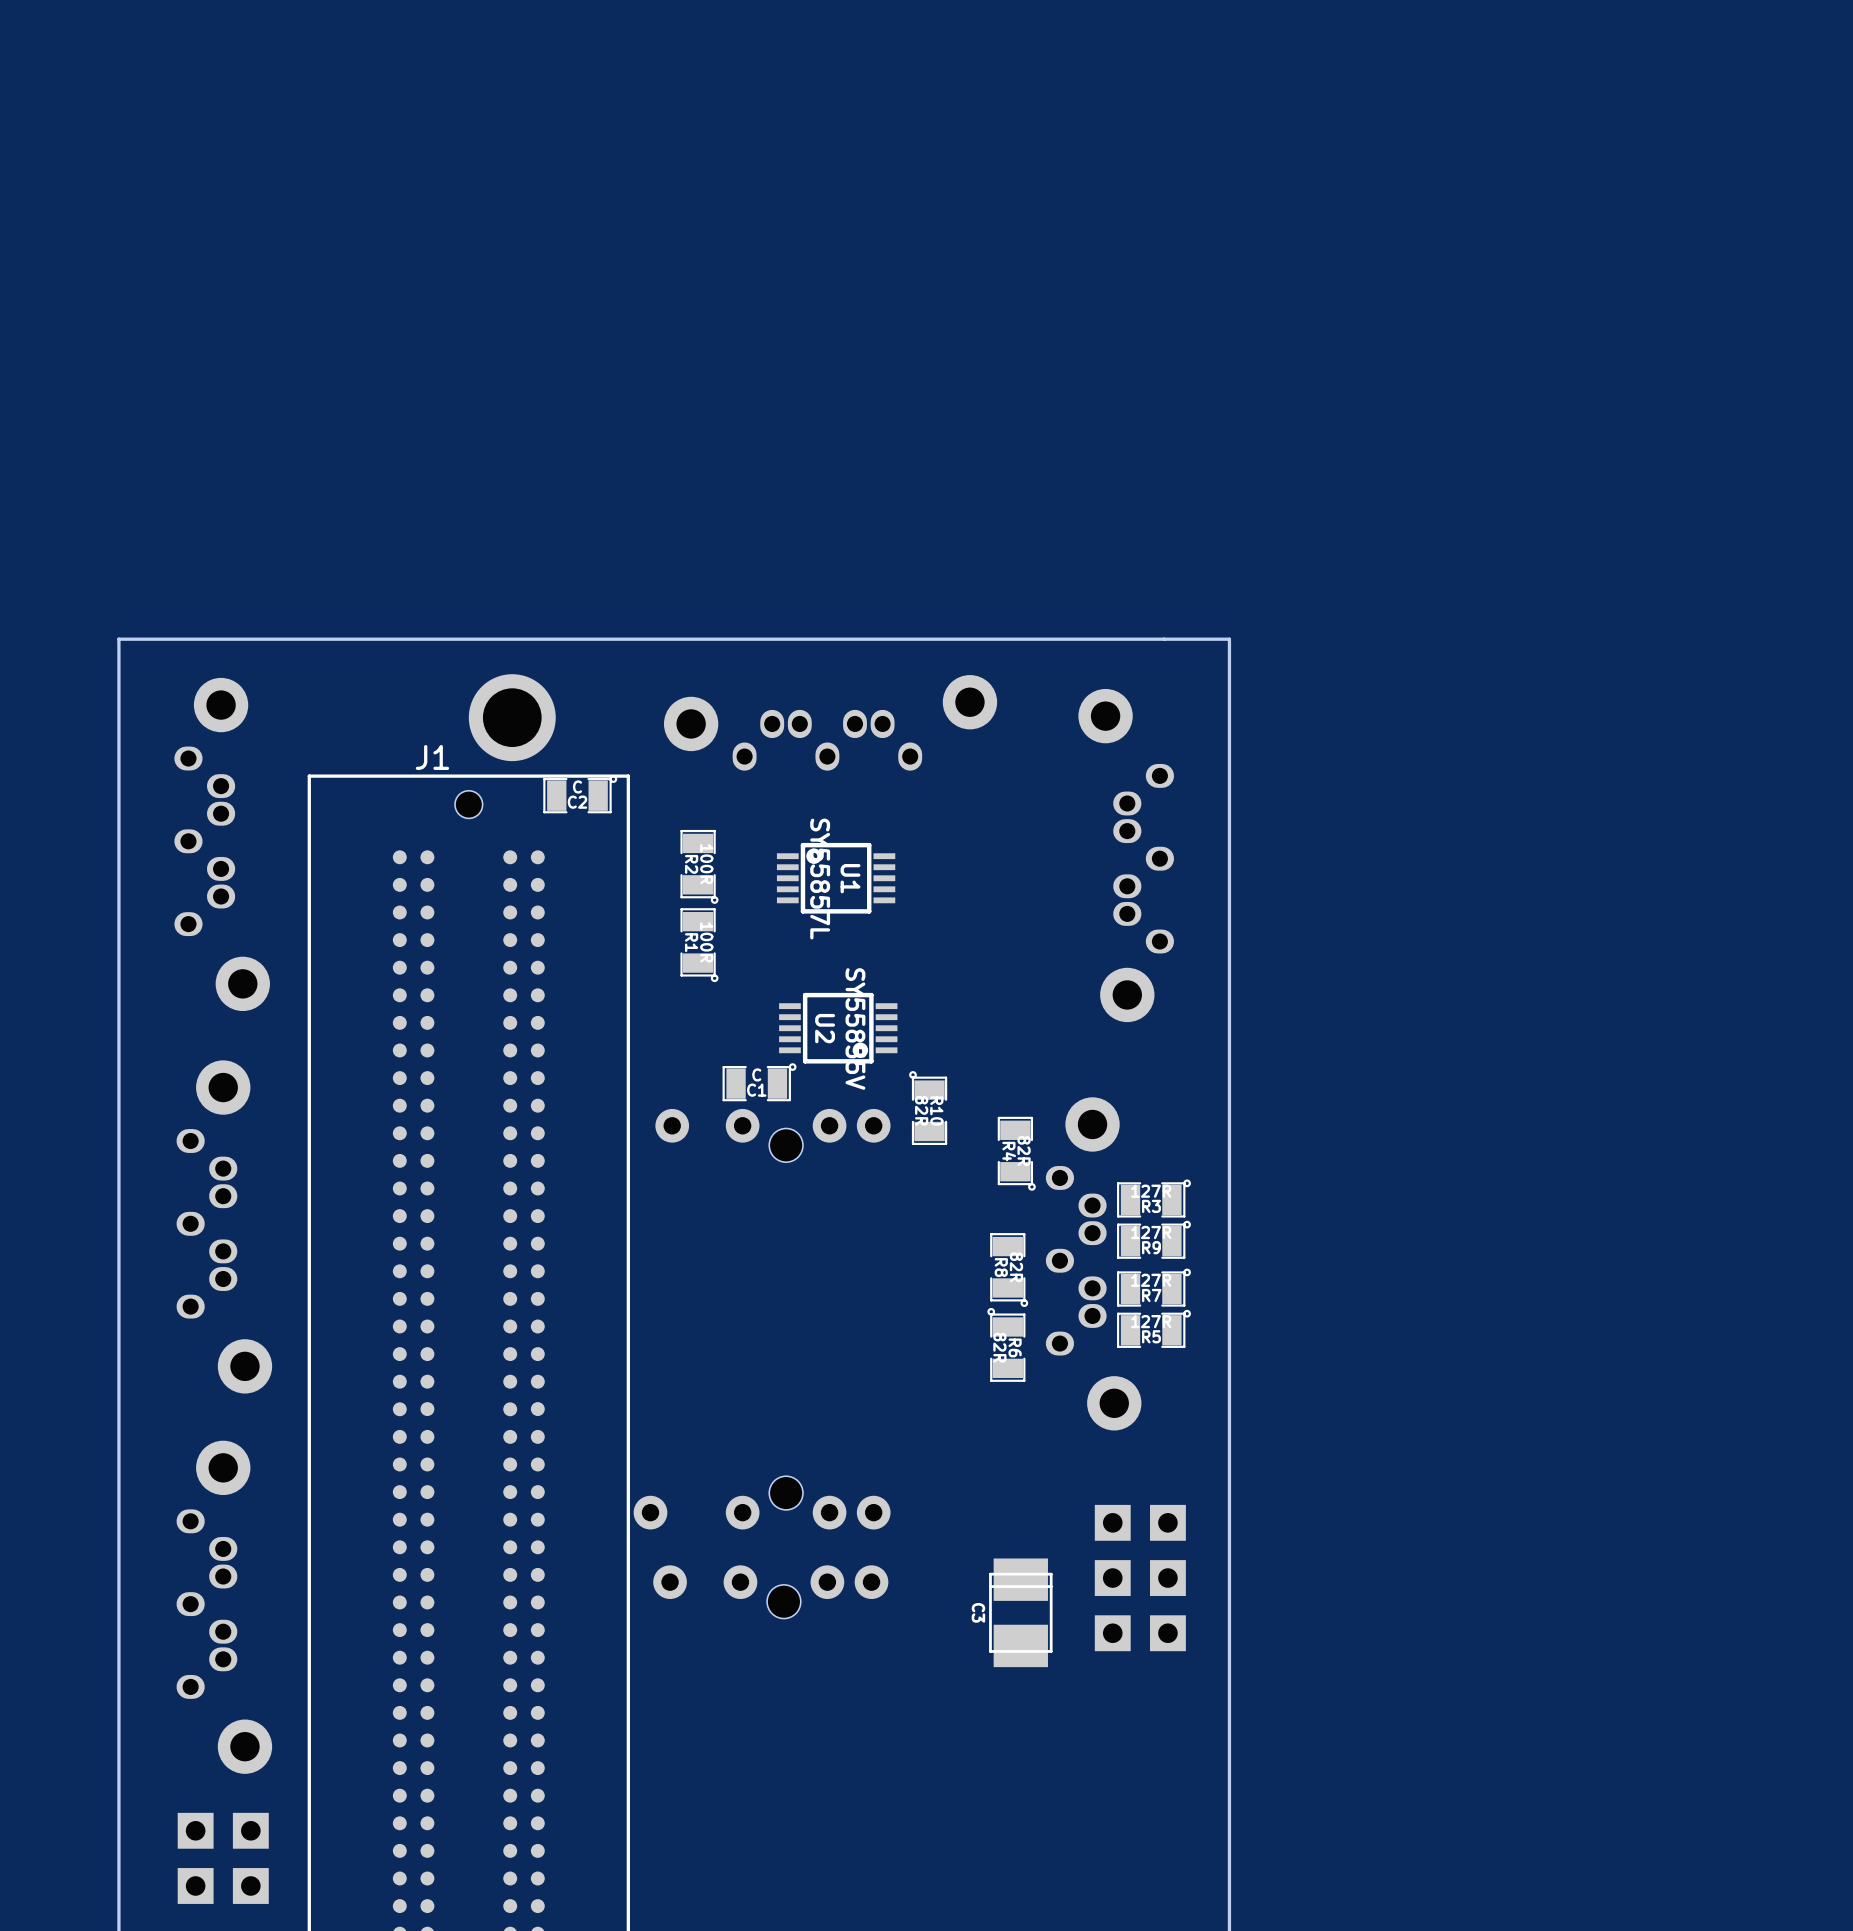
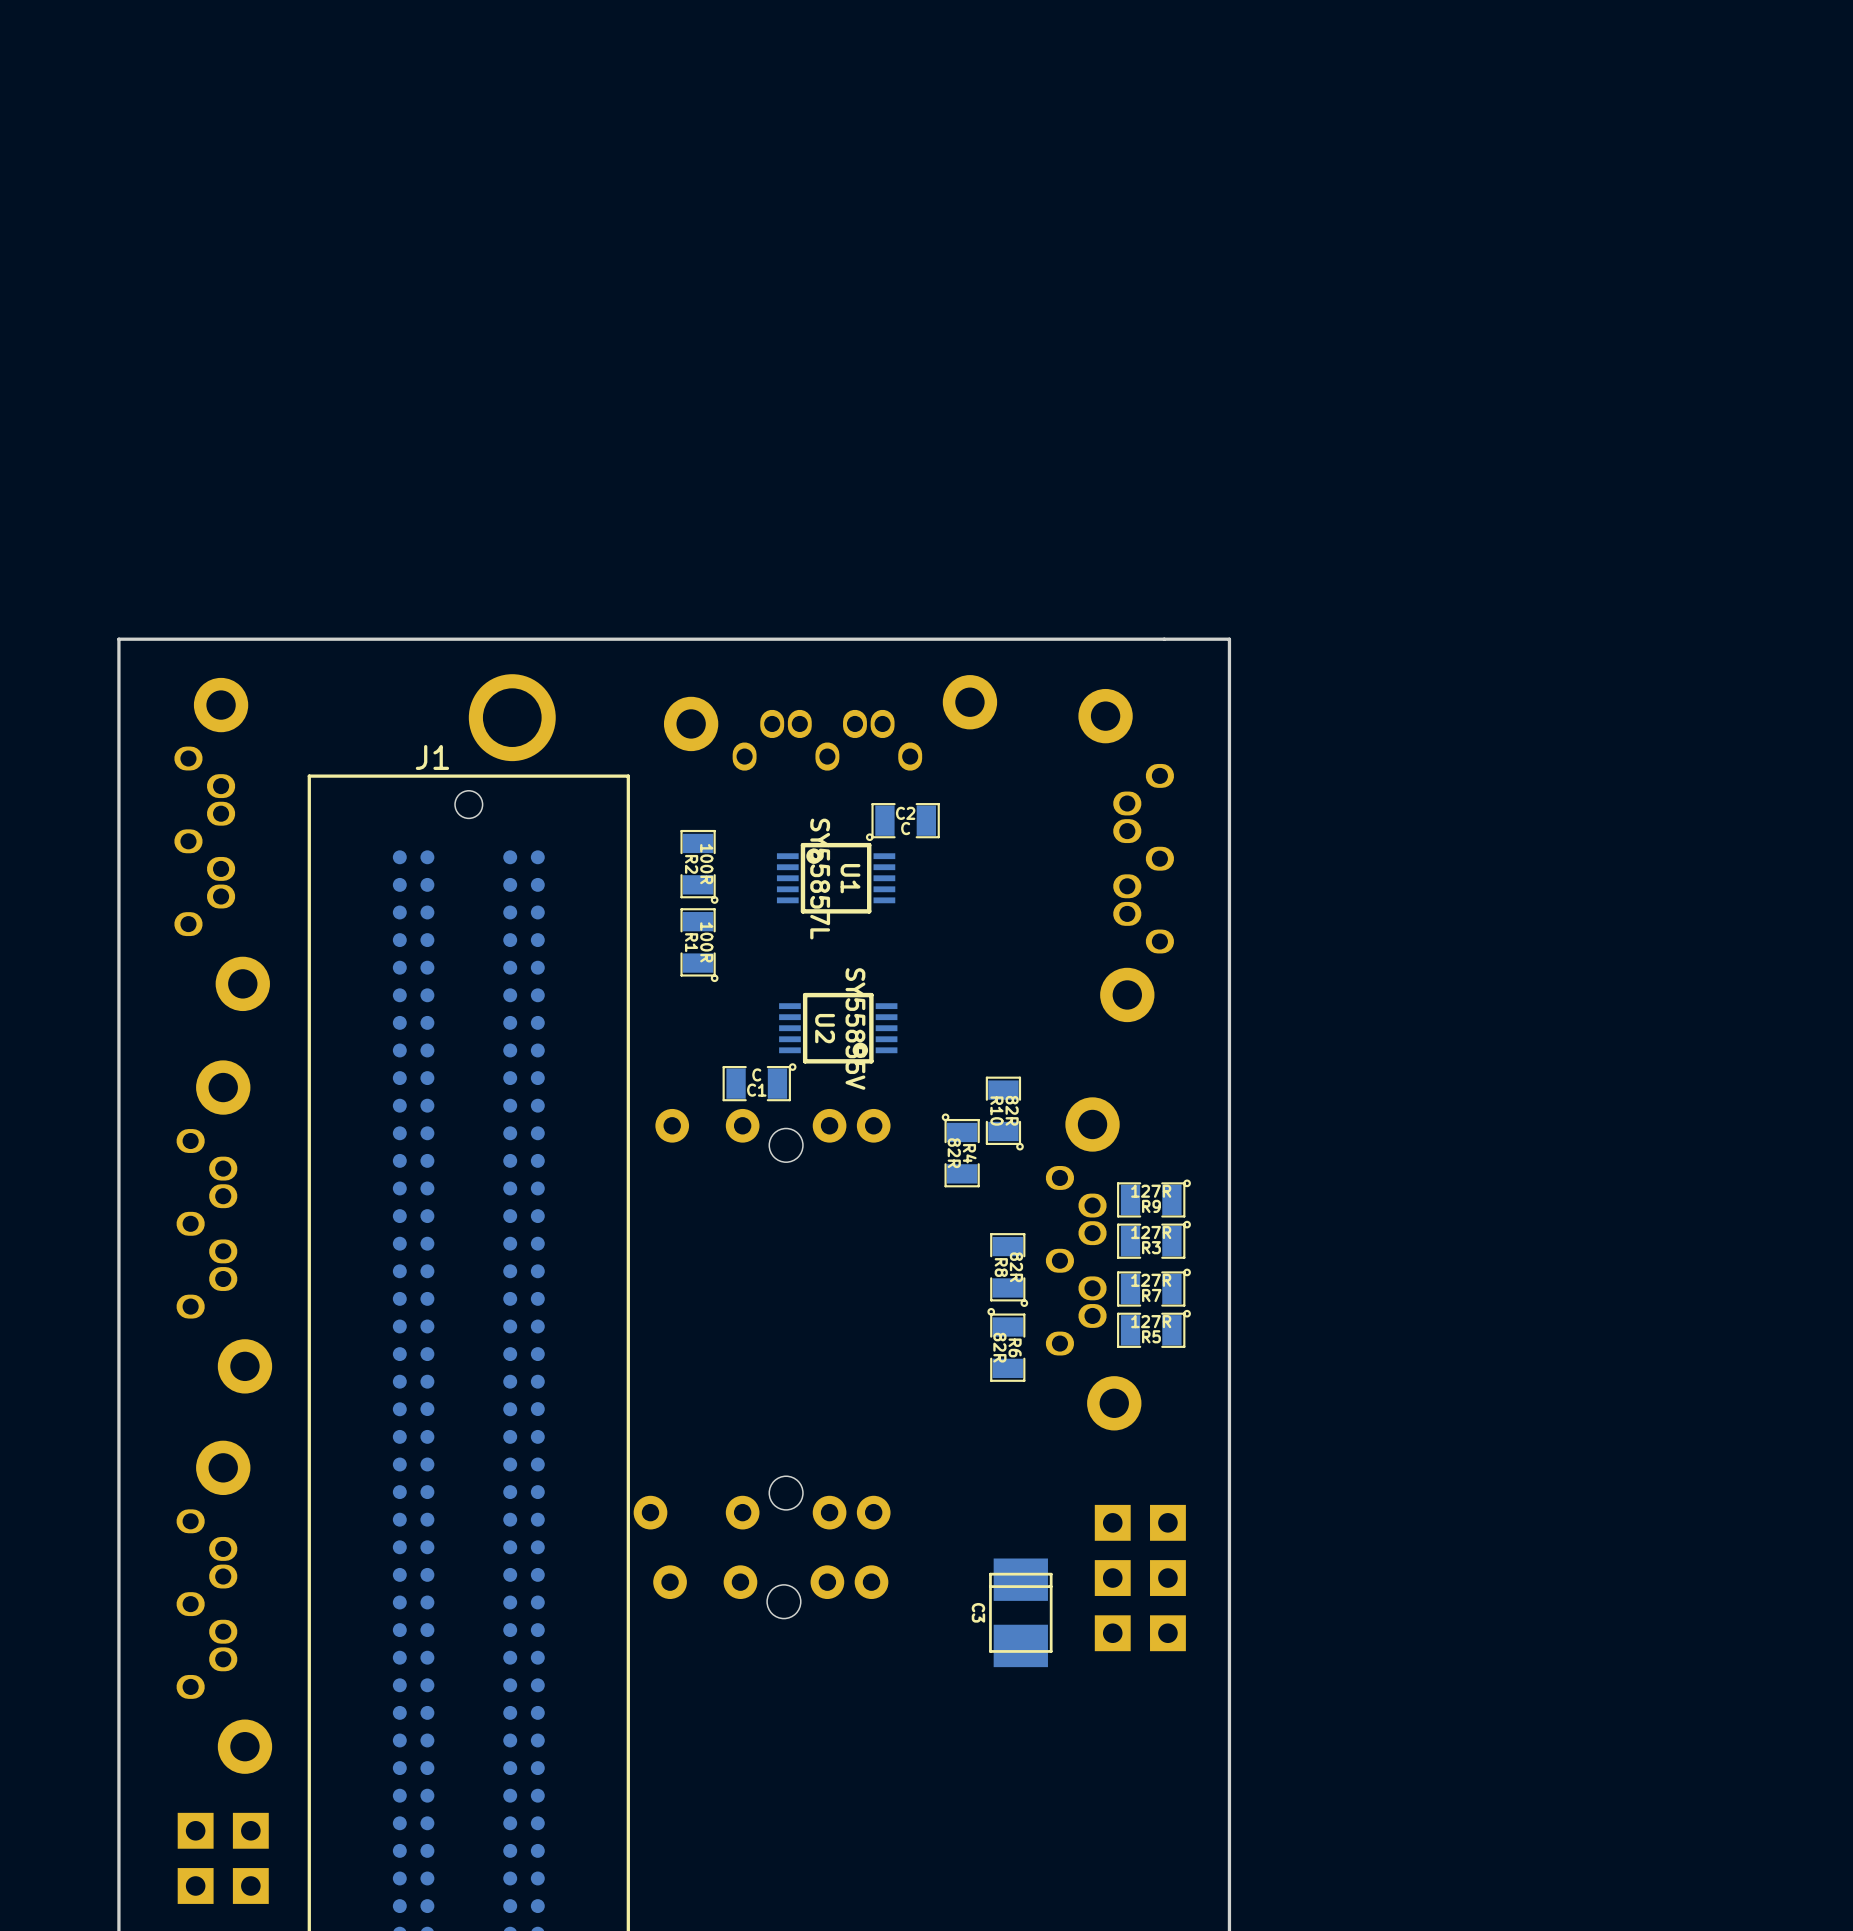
C2 rotation: 0° (580, 794) -> 180° (902, 822)
C2 position: (580, 794) -> (902, 822)
R10 rotation: 0° (928, 1108) -> 180° (1004, 1113)
R10 position: (928, 1108) -> (1004, 1113)
R4 rotation: 0° (1016, 1153) -> 180° (960, 1150)
R4 position: (1016, 1153) -> (960, 1150)
R3 name: R3 (1151, 1206) -> R9 (1151, 1206)
R9 name: R9 (1151, 1247) -> R3 (1151, 1247)

